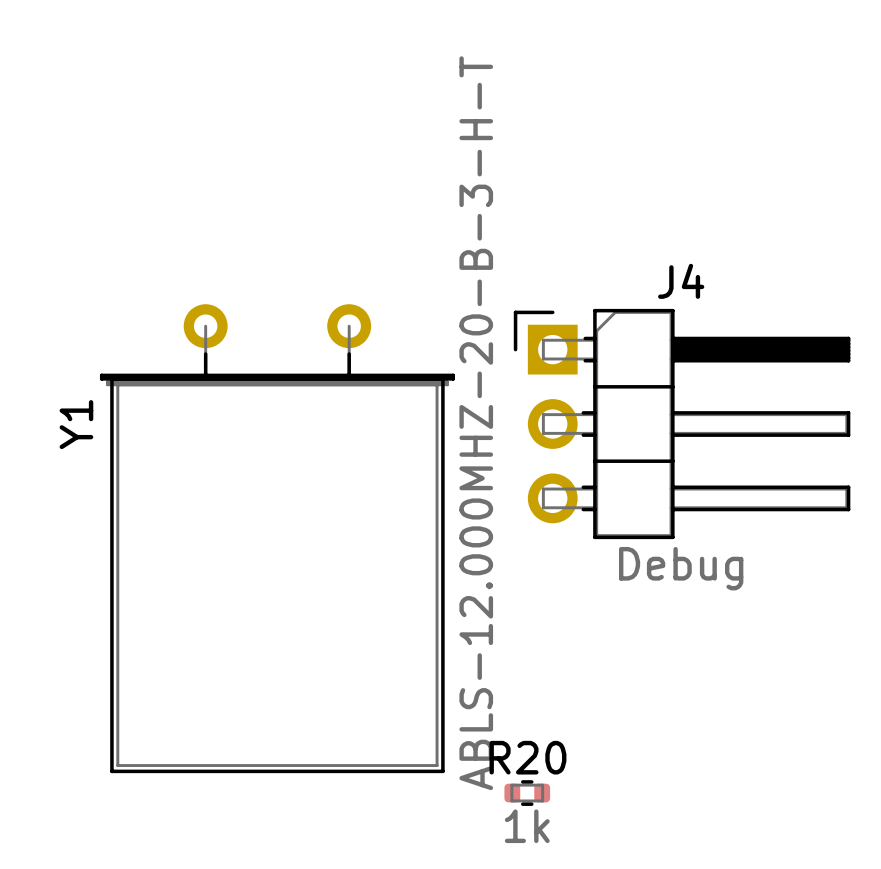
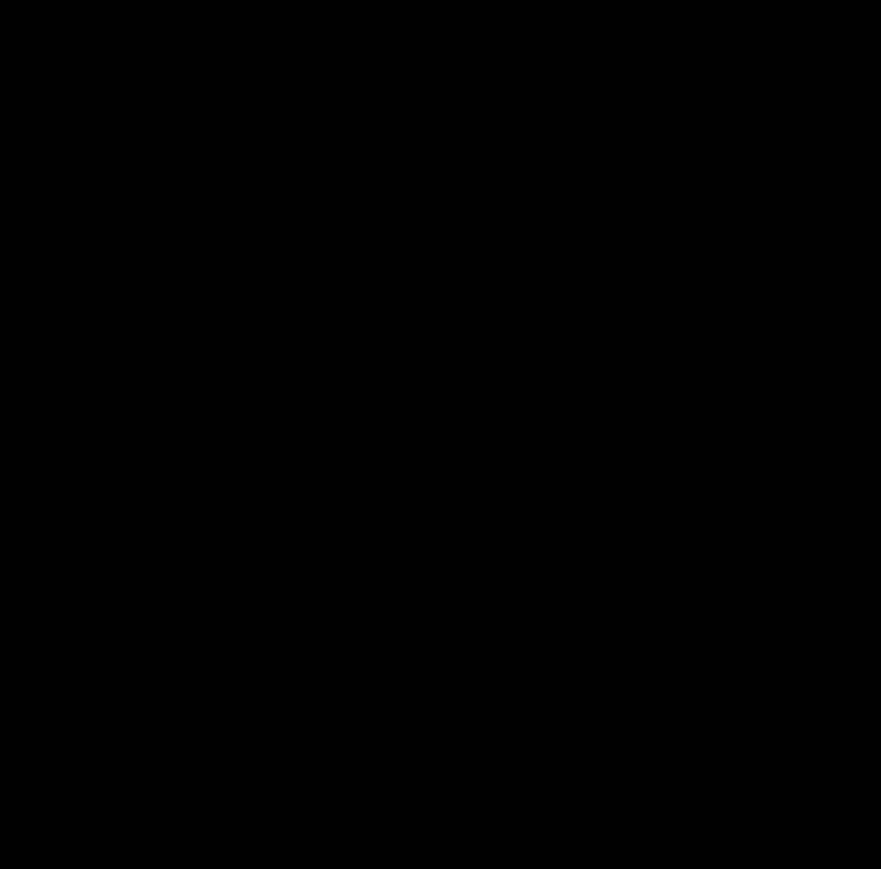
J4: Debug (682, 424) -> none
Y1: ABLS-12.000MHZ-20-B-3-H-T (277, 538) -> none
R20: 1k (527, 793) -> none

